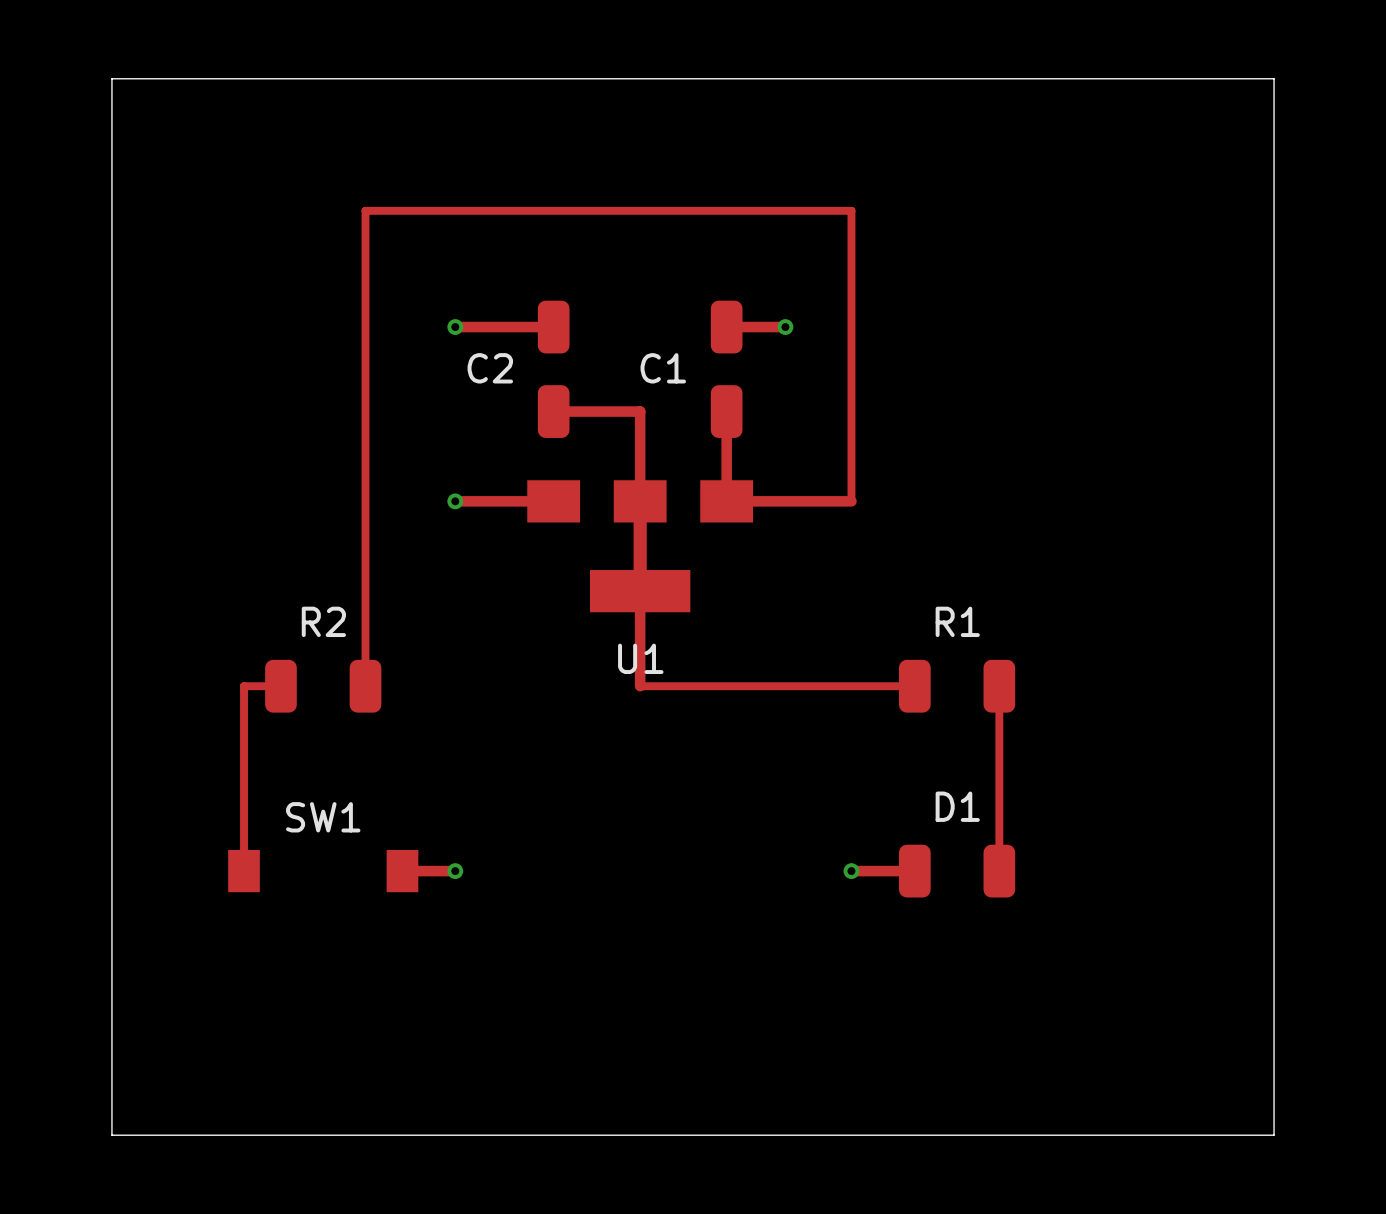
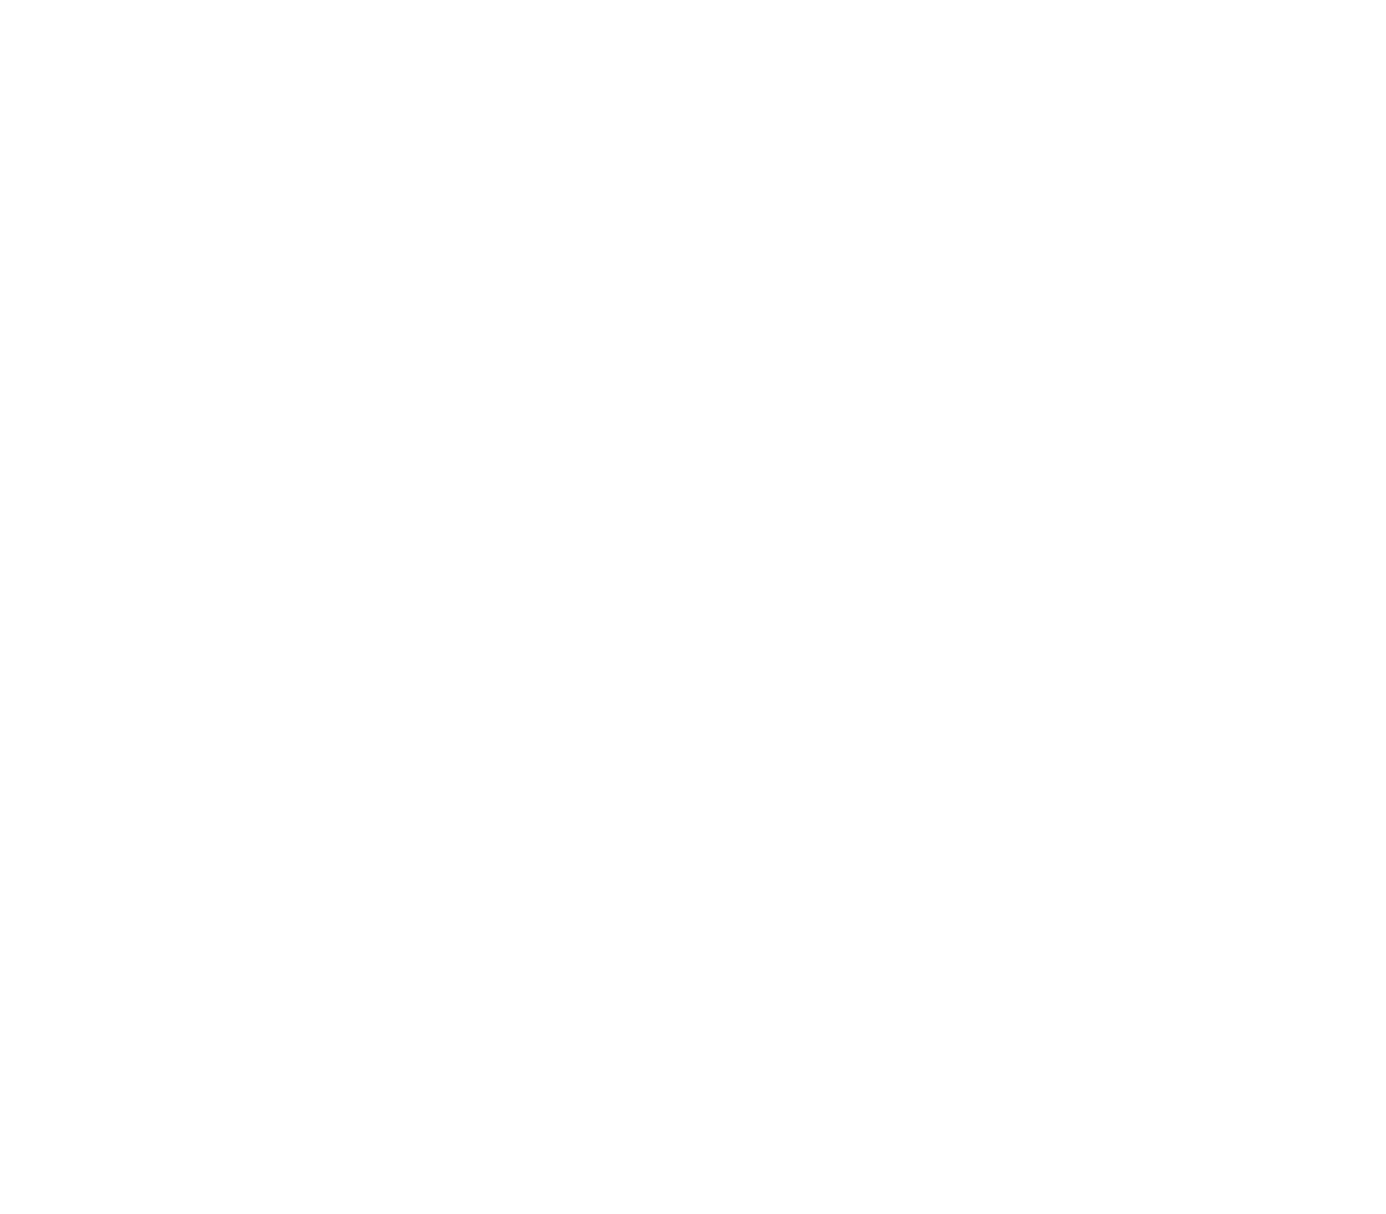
board edge: (111, 78) (1274, 78) (1274, 1135) (111, 1135) (111, 78) -> none
track: (455, 327) (553, 327) -> none
via: (455, 327) -> none
track: (726, 327) (785, 327) -> none
via: (785, 327) -> none
C2: (553, 369) -> none
C1: (726, 369) -> none
track: (553, 411) (640, 411) (640, 686) (914, 686) -> none
track: (726, 411) (726, 501) (851, 501) (851, 210) (365, 210) (365, 686) -> none
track: (455, 501) (553, 501) -> none
via: (455, 501) -> none
U1: (640, 546) -> none
track: (280, 686) (244, 686) (244, 871) -> none
R2: (323, 686) -> none
R1: (957, 686) -> none
track: (999, 686) (999, 871) -> none
SW1: (323, 871) -> none
track: (402, 871) (455, 871) -> none
via: (455, 871) -> none
track: (851, 871) (914, 871) -> none
via: (851, 871) -> none
D1: (957, 871) -> none

